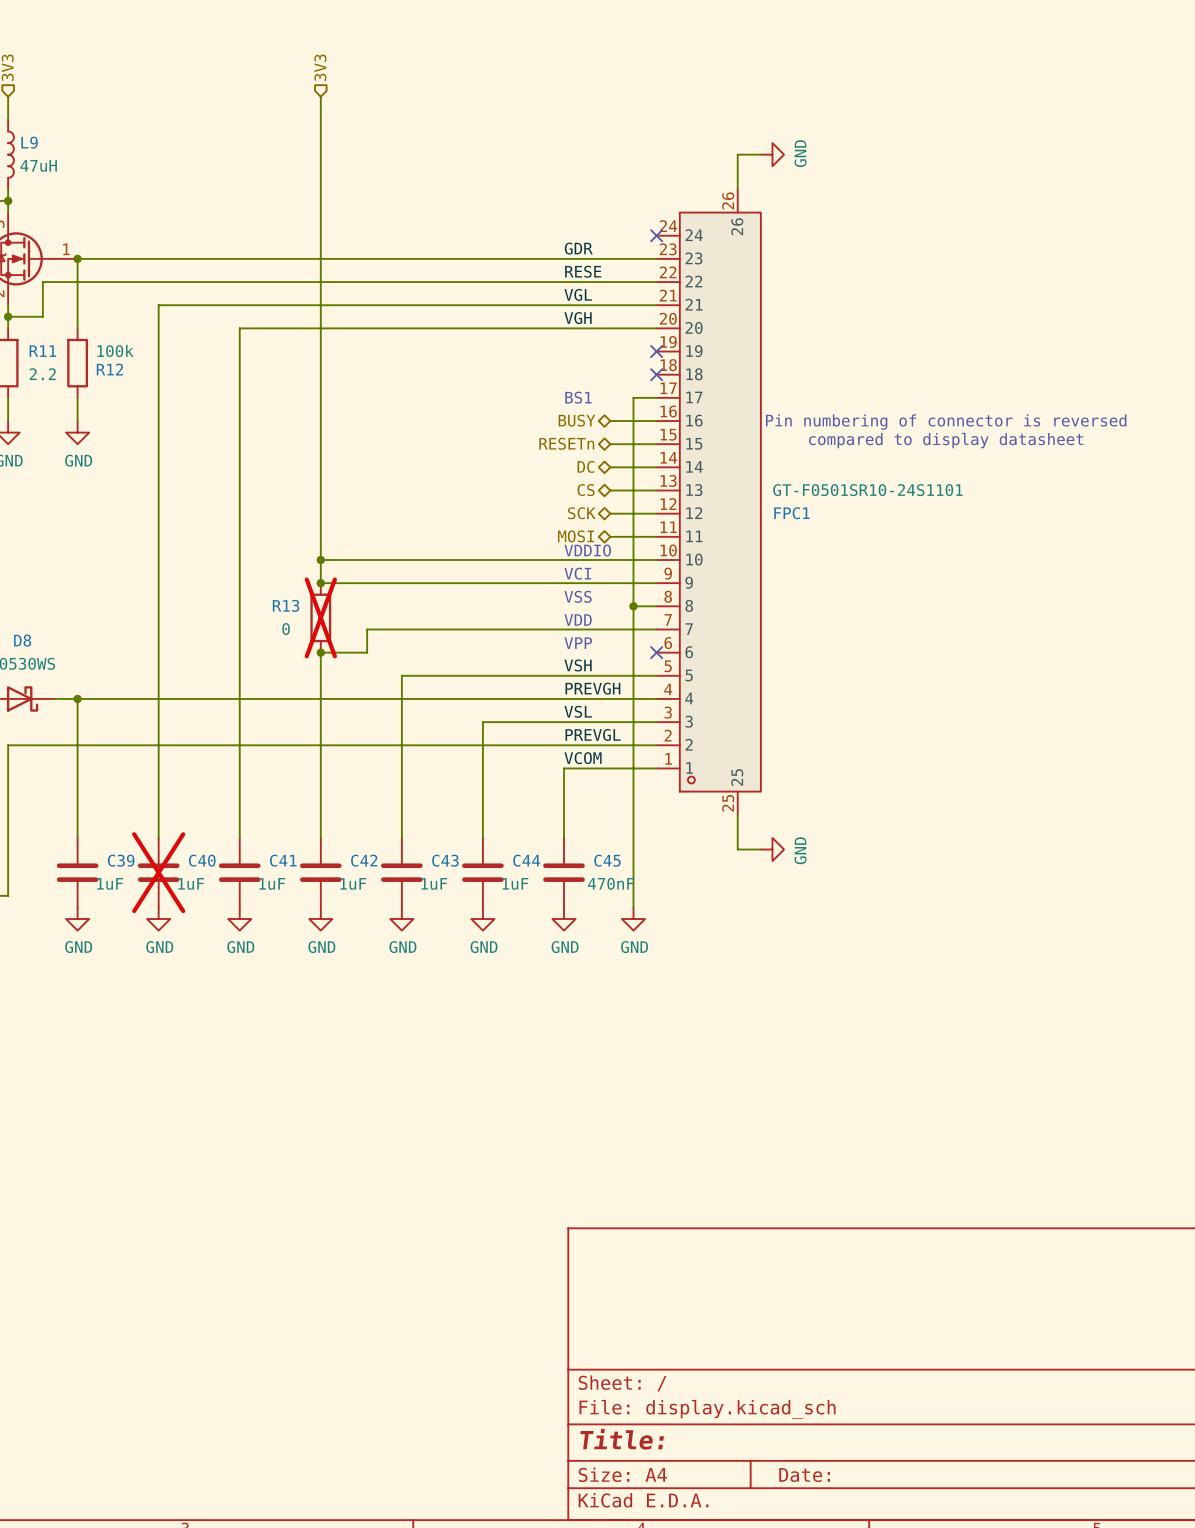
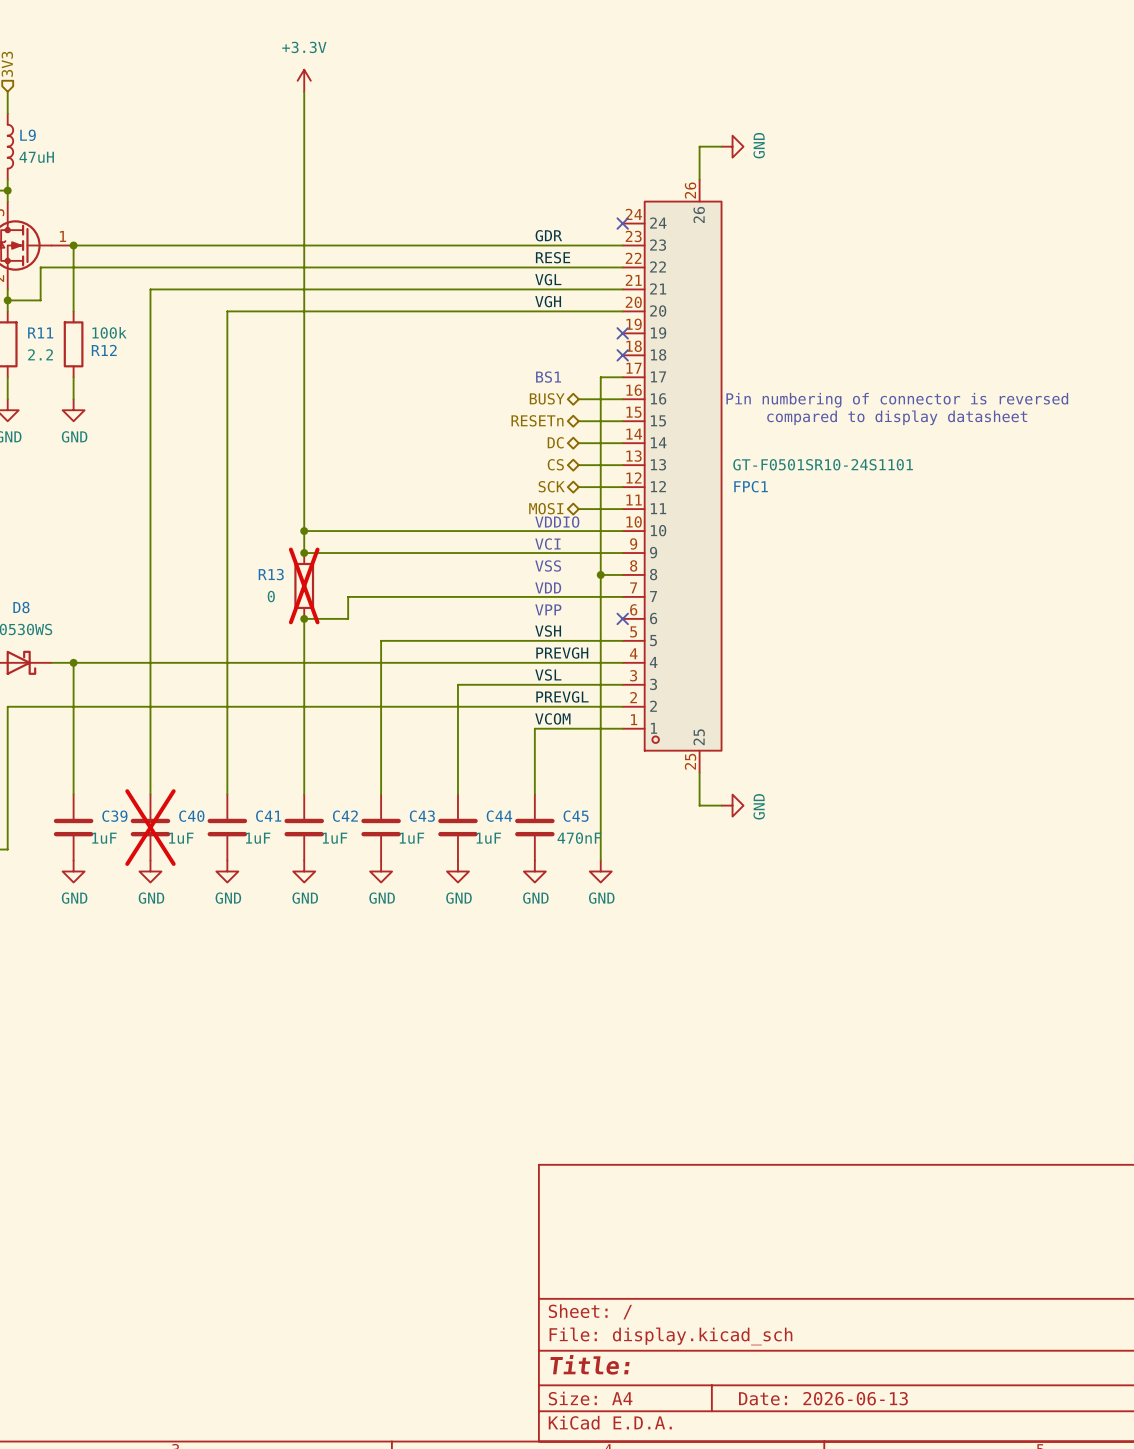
hierarchical label: 3V3 (320, 67) -> none
power symbol: none -> +3.3V (304, 80)
title block: Date: (804, 1475) -> Date: 2026-06-13 (823, 1398)

